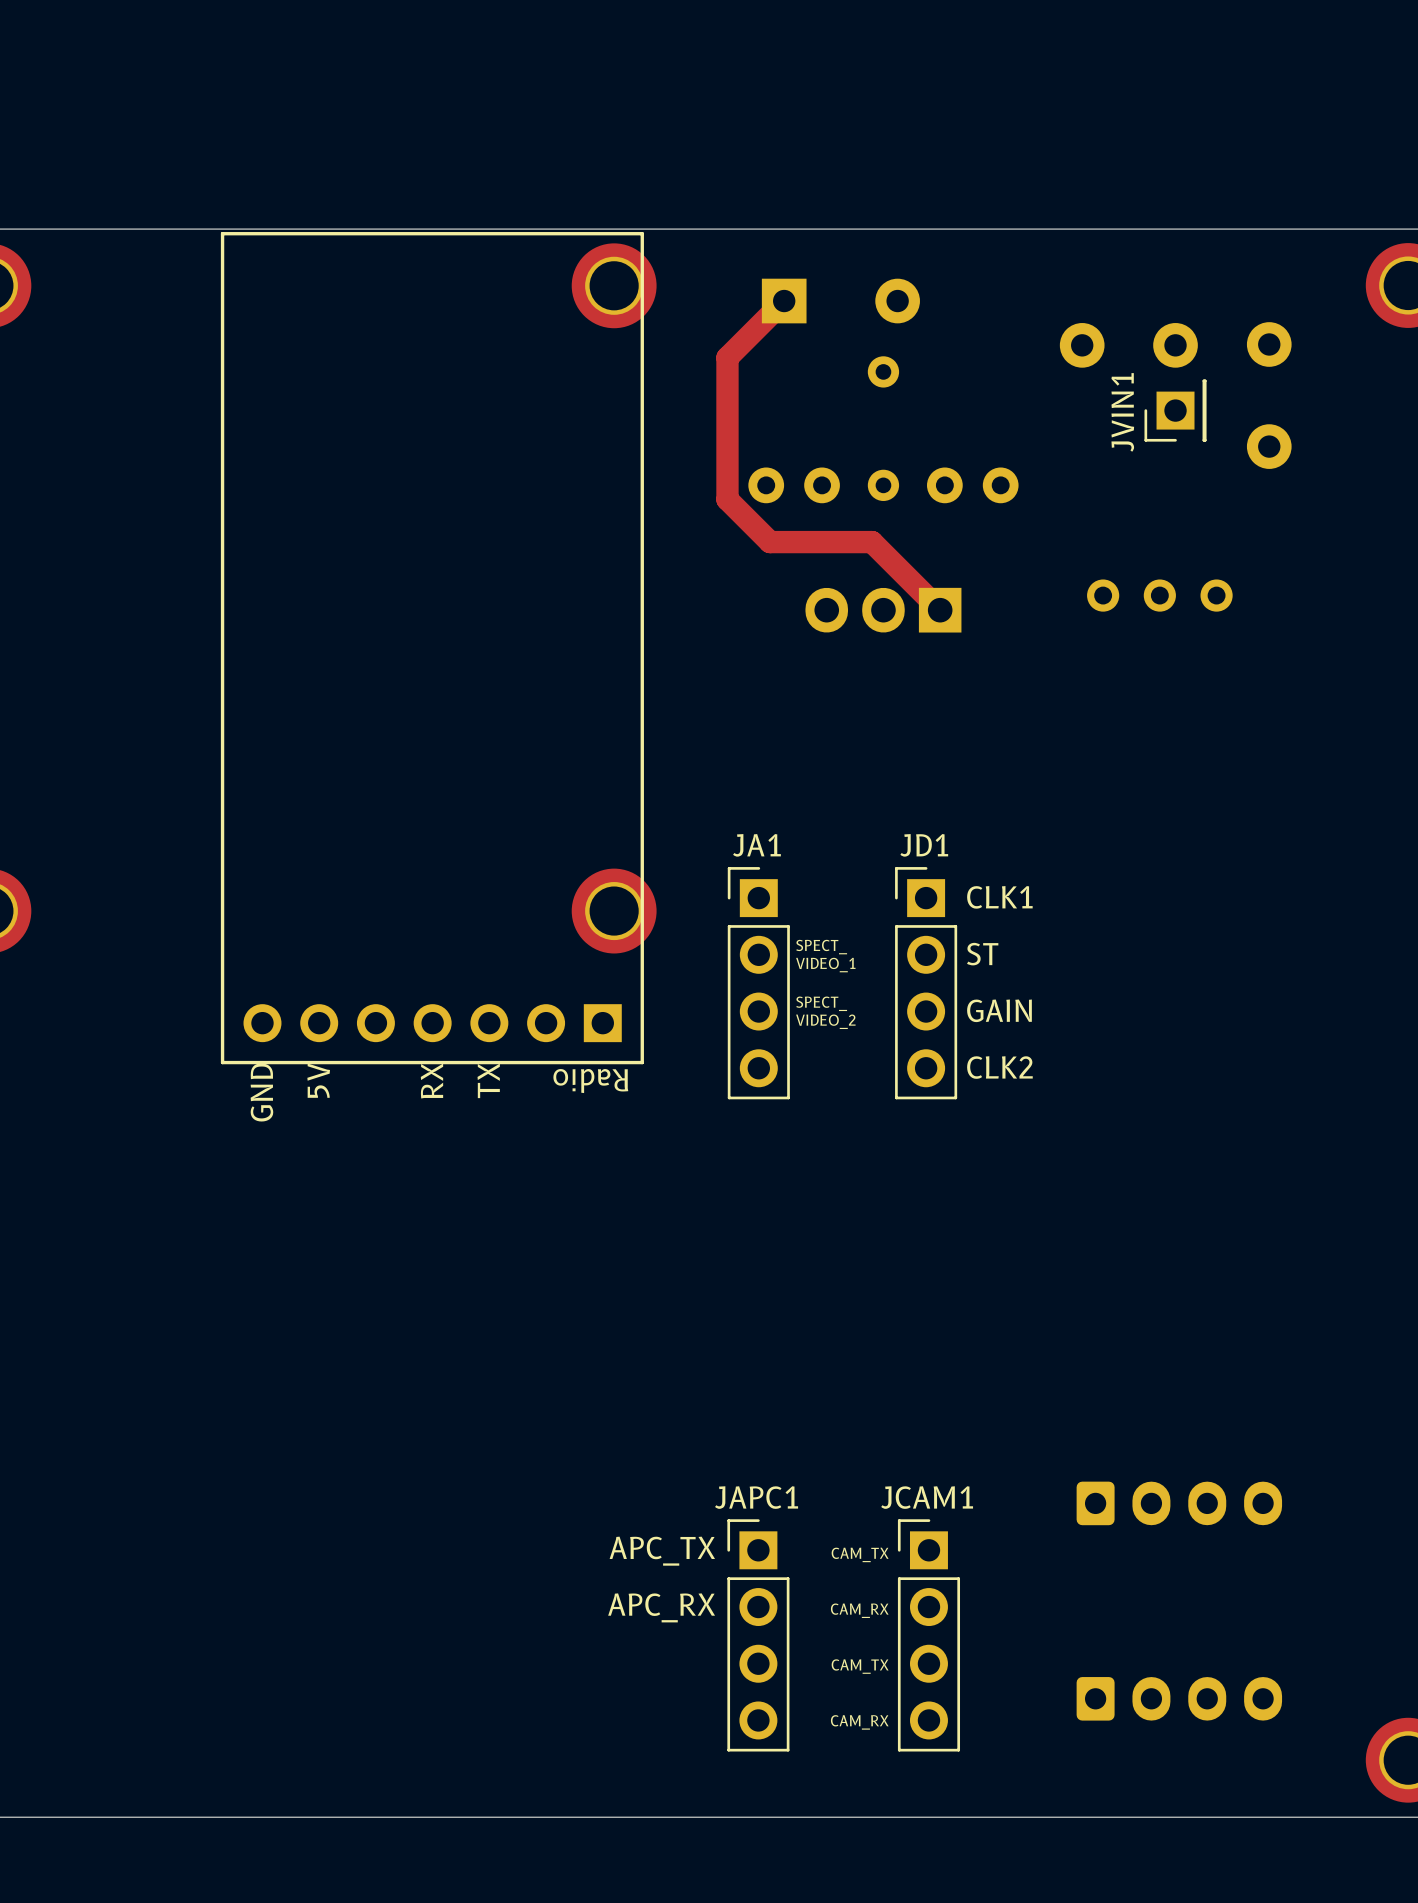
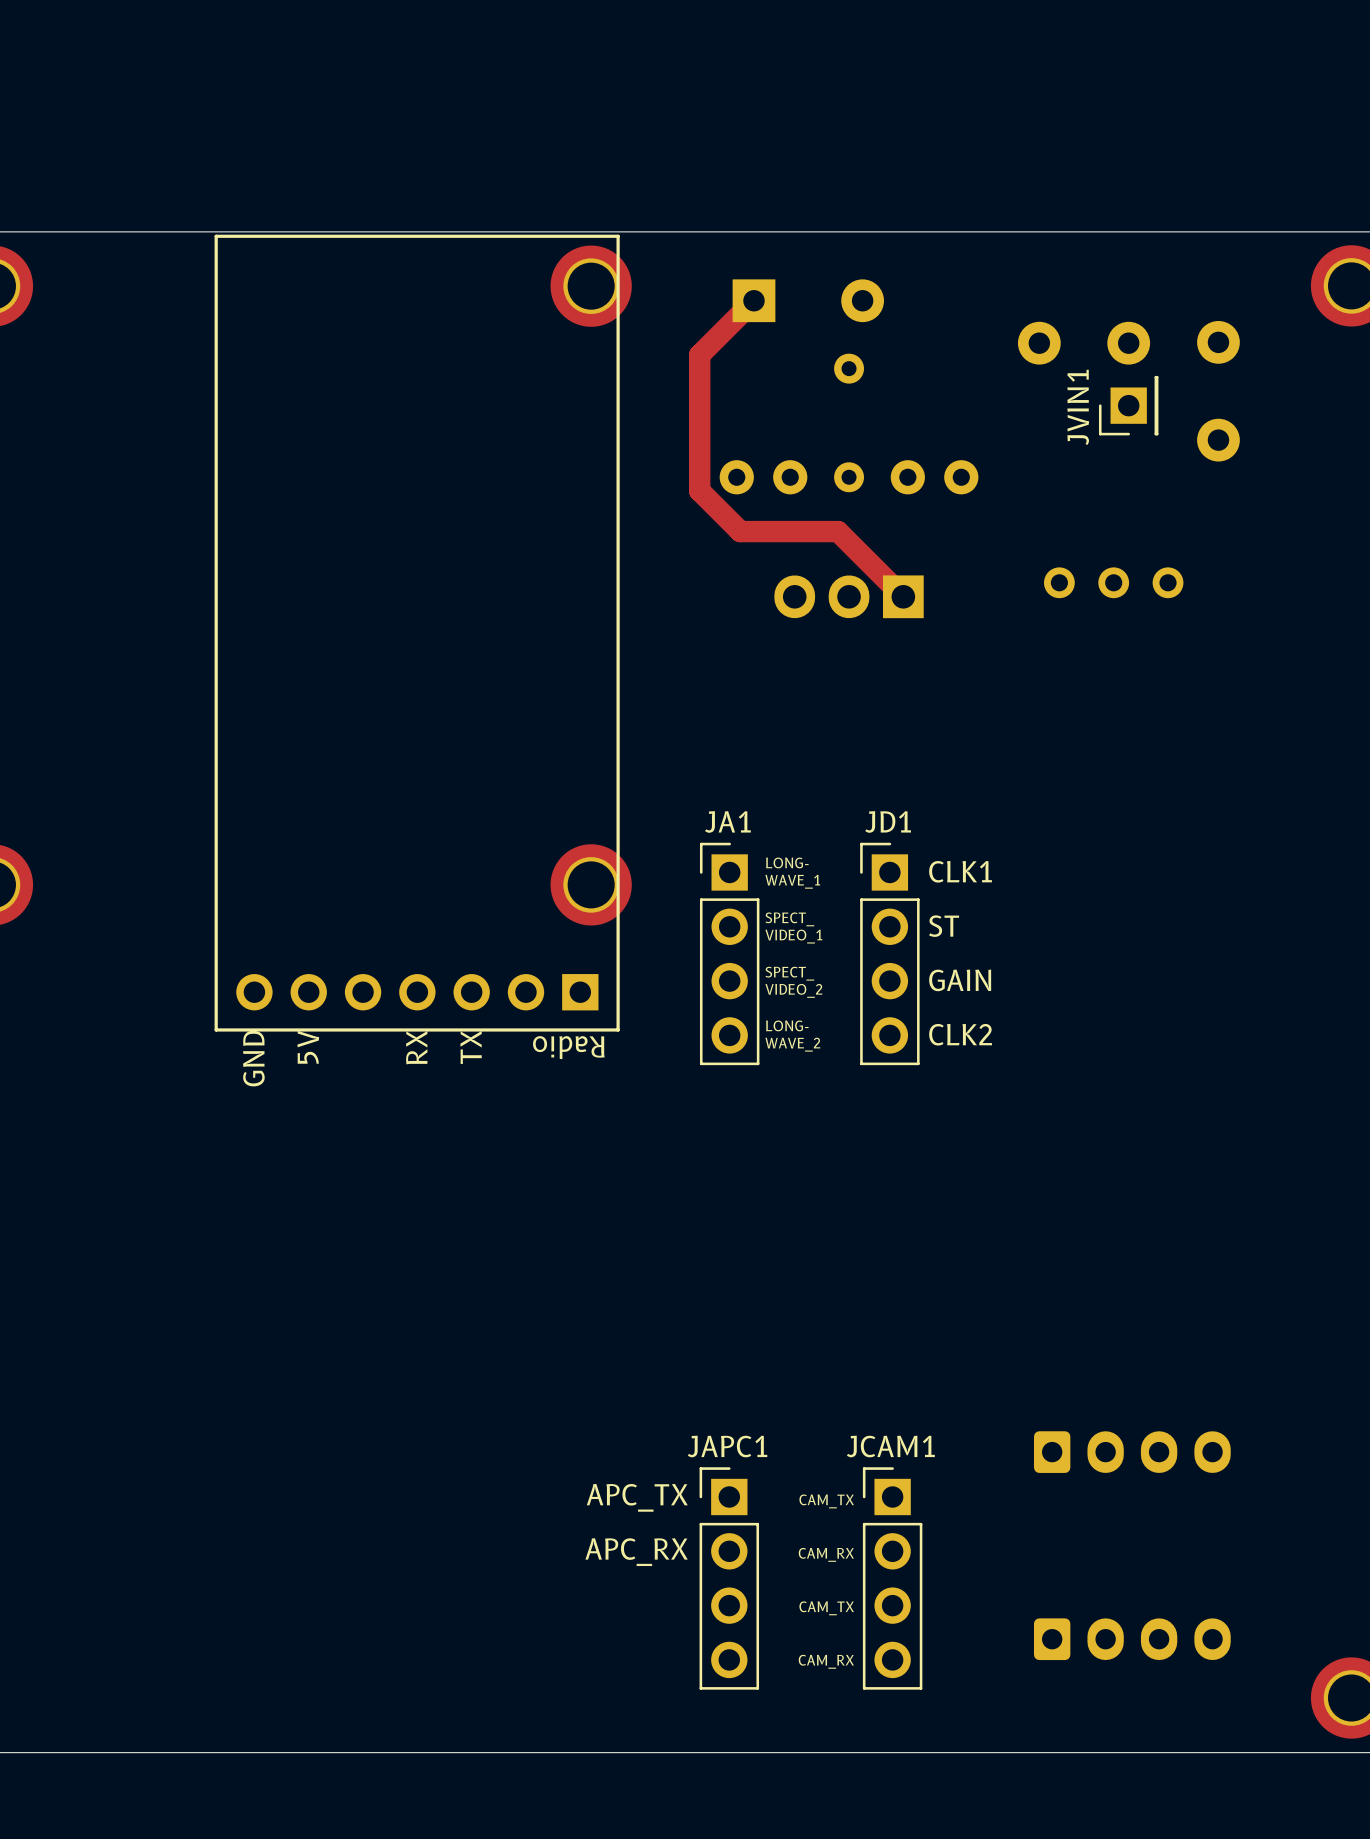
text: none -> LONG- (787, 862)
text: none -> WAVE_1 (792, 881)
text: none -> LONG- (787, 1025)
text: none -> WAVE_2 (792, 1044)

